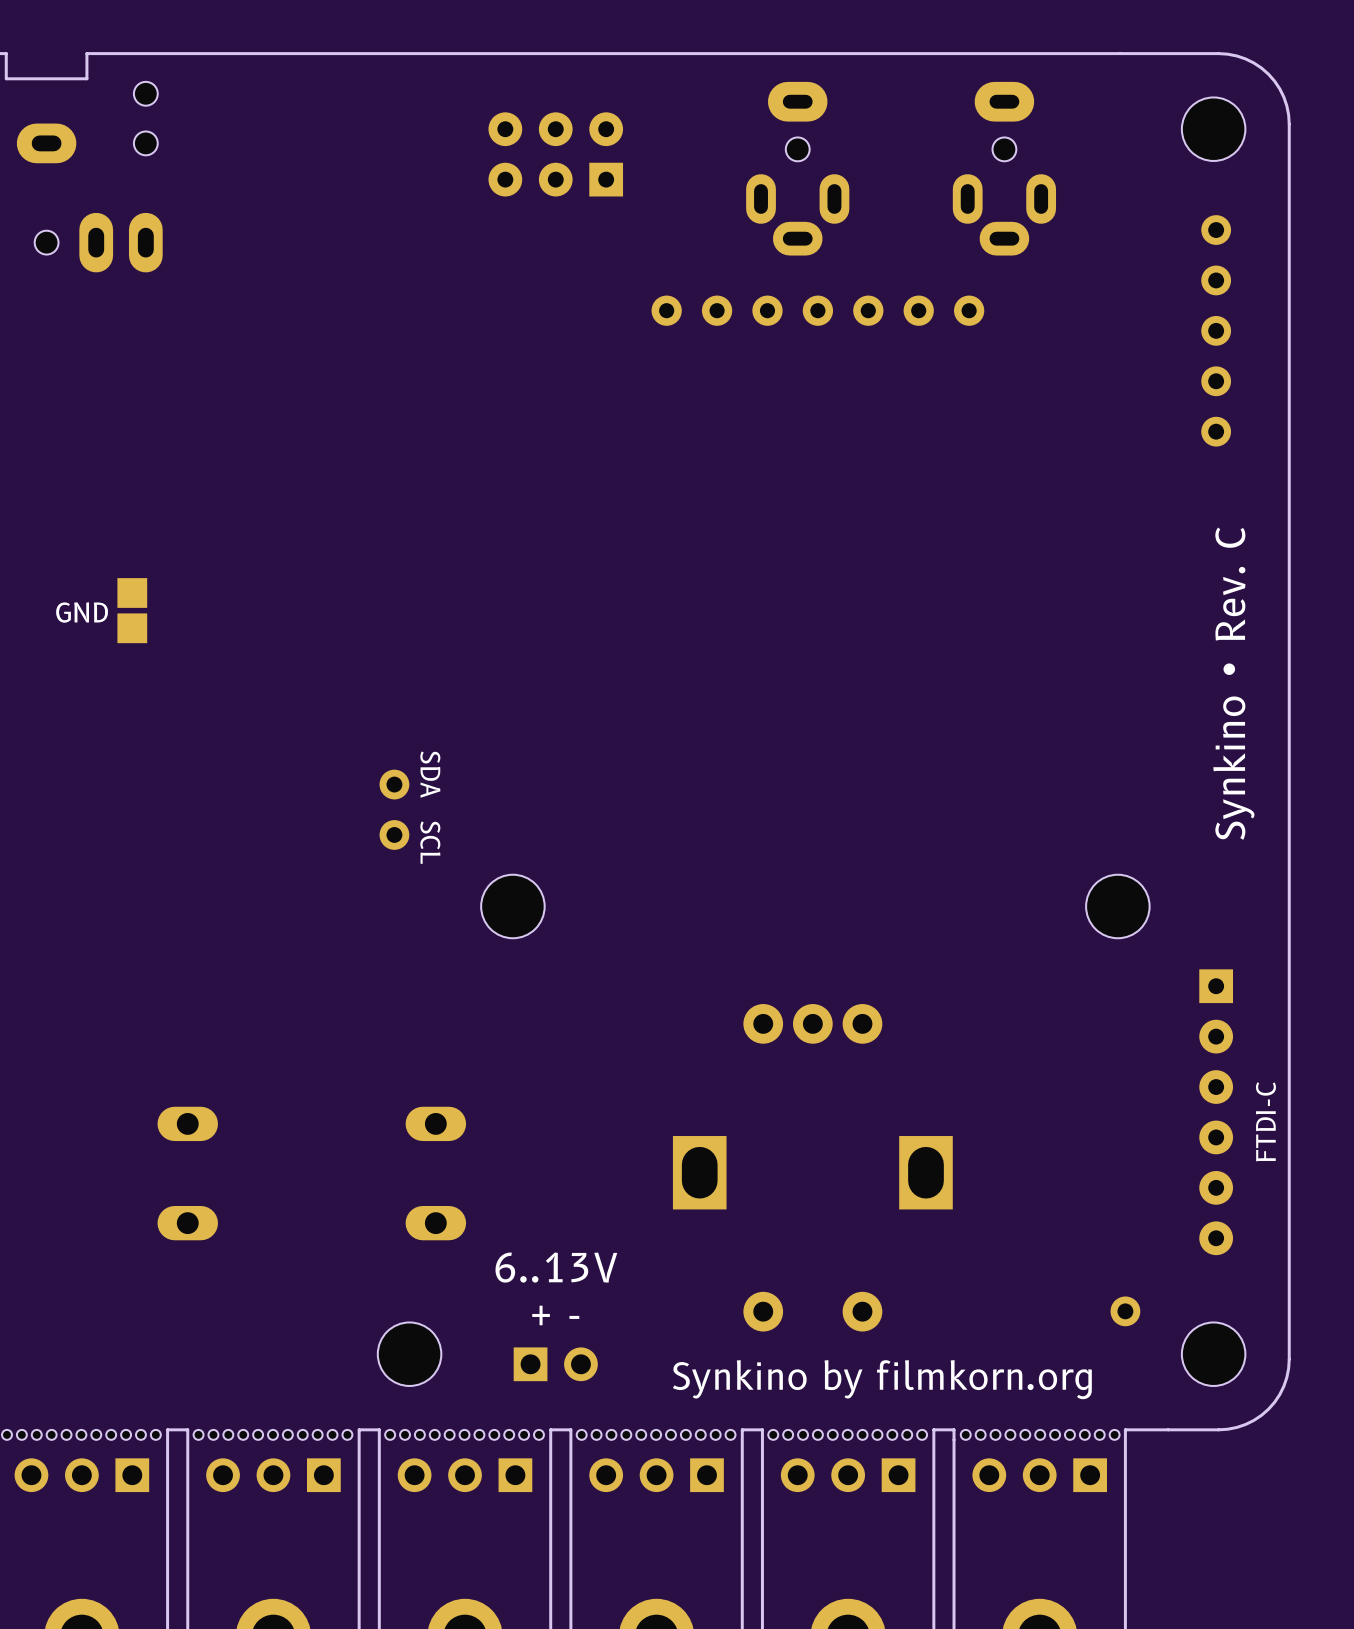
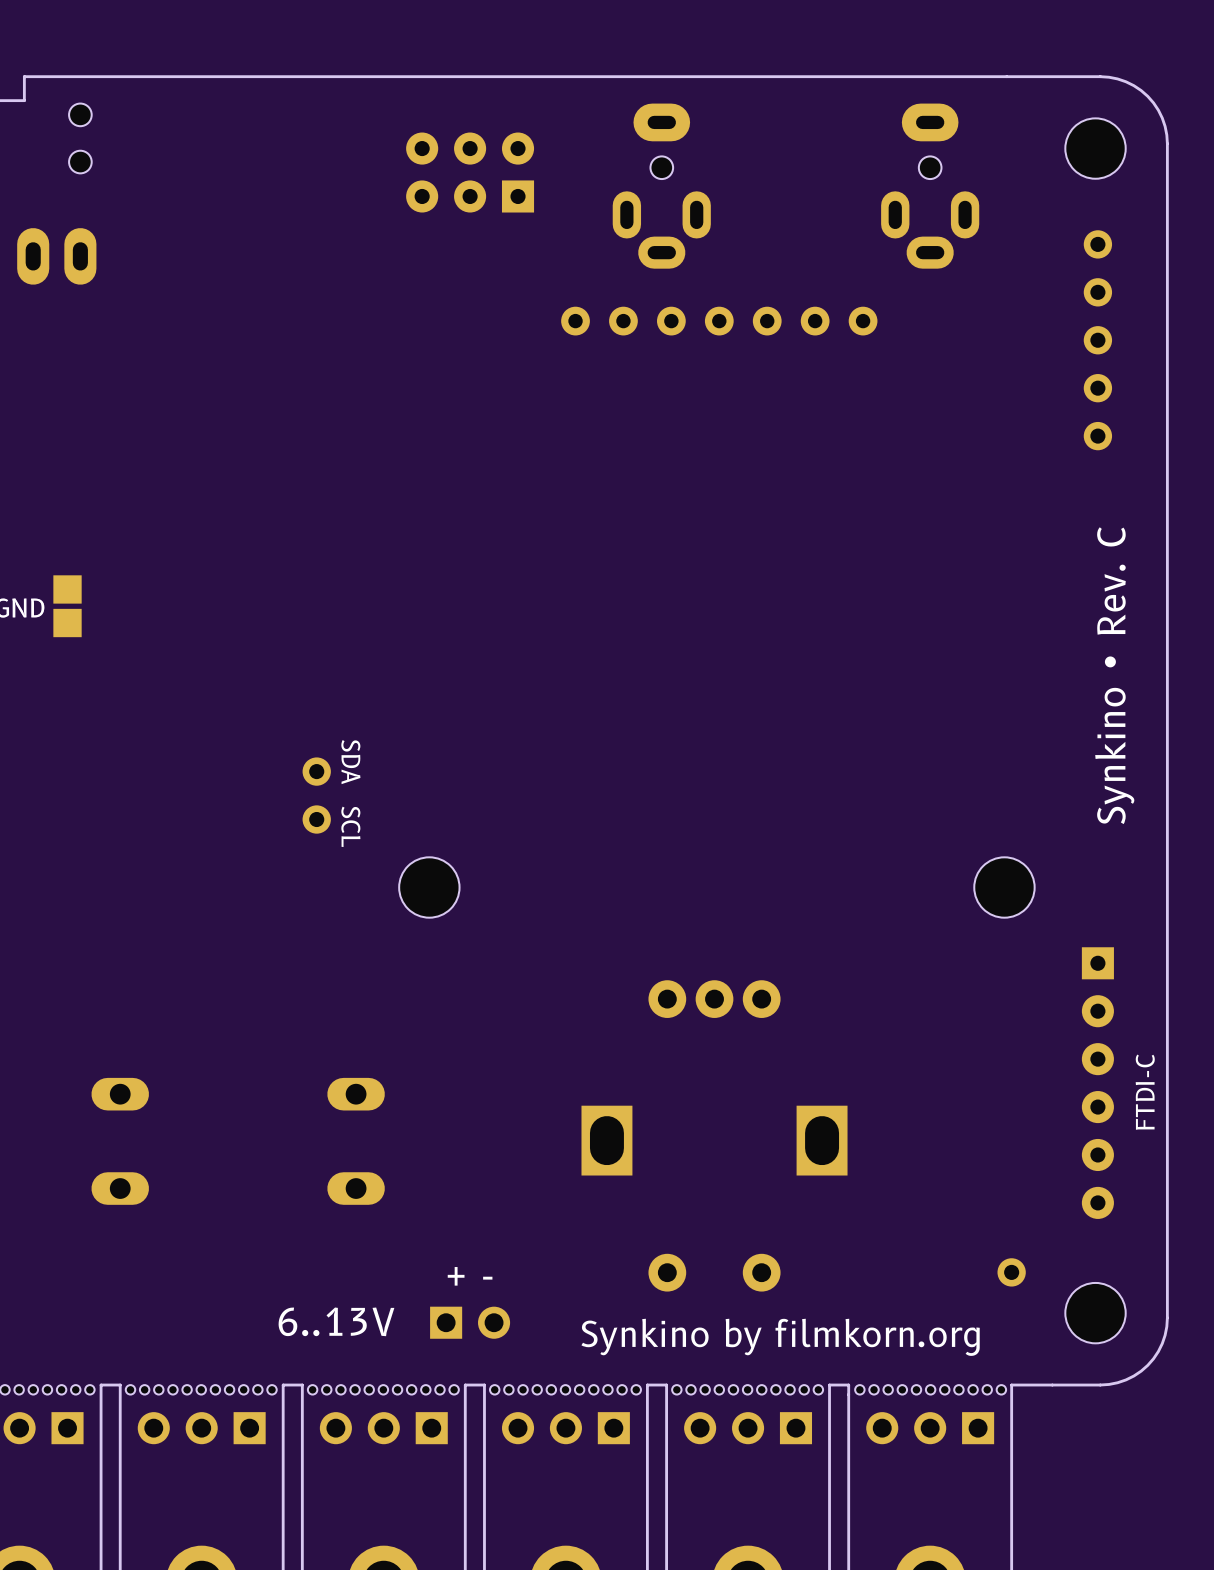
part position: (797, 168) -> (661, 186)
part position: (1004, 168) -> (930, 186)
text position: 6..13V (556, 1267) -> 6..13V (336, 1321)
part: (409, 1354) -> none

